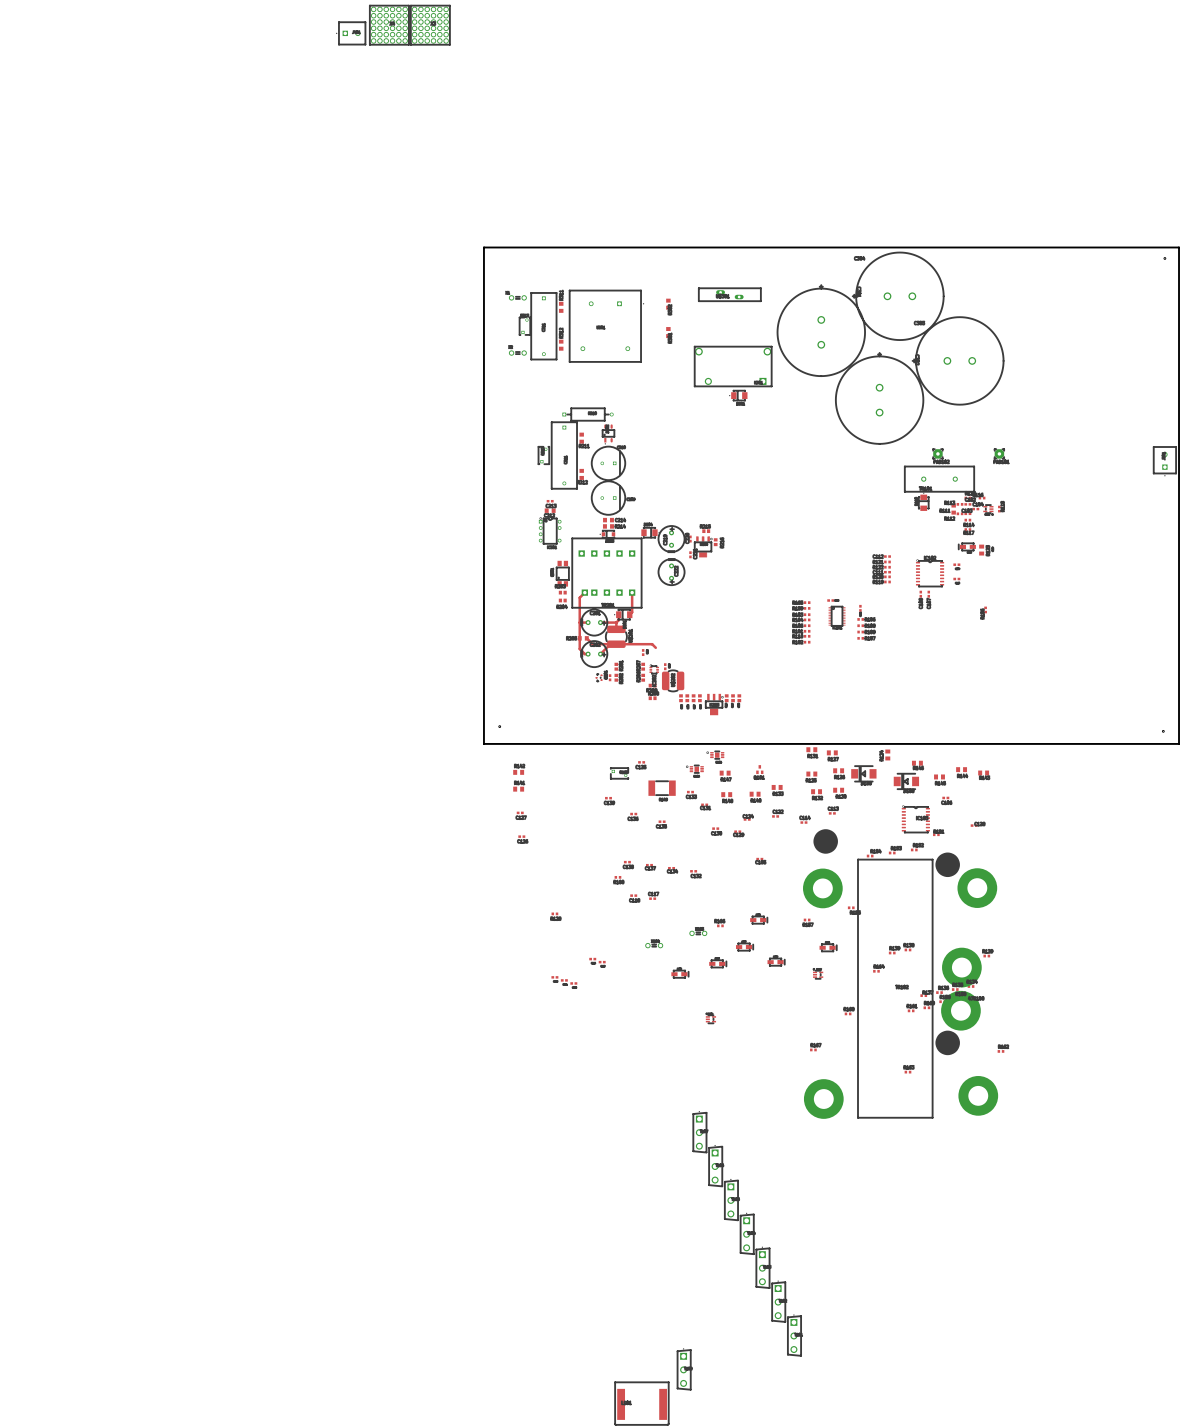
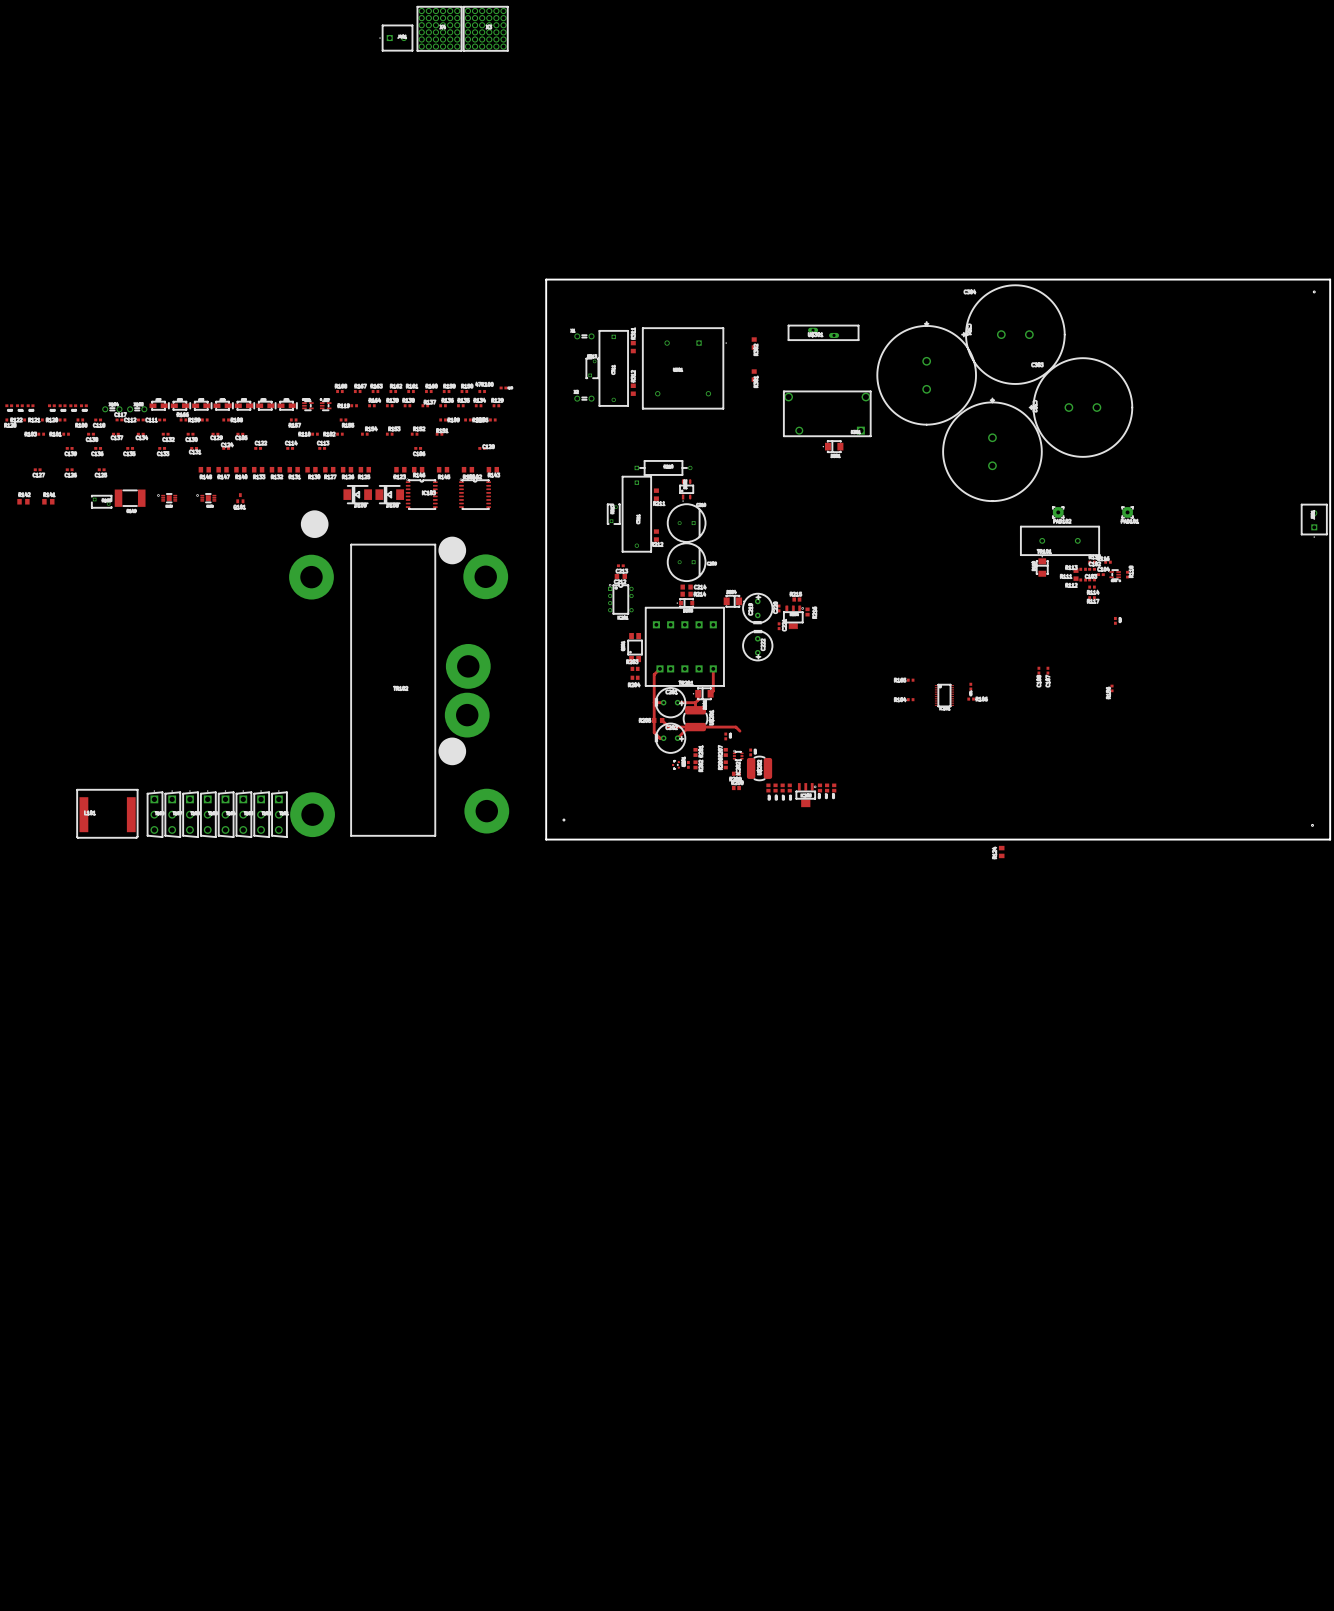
part rotation: 0° (967, 546) -> 180° (266, 405)
part position: (967, 546) -> (266, 405)
part rotation: 0° (981, 550) -> 90° clockwise (400, 469)
part position: (981, 550) -> (400, 469)
part position: (887, 556) -> (140, 419)
part position: (887, 561) -> (44, 419)
part position: (956, 564) -> (83, 405)
part position: (887, 567) -> (27, 419)
part position: (887, 572) -> (162, 419)
part position: (930, 573) -> (475, 494)
part position: (887, 576) -> (62, 419)
part position: (956, 579) -> (73, 405)
part position: (887, 581) -> (354, 405)
part position: (830, 600) -> (503, 387)
part position: (807, 608) -> (204, 419)
part position: (807, 614) -> (41, 434)
part position: (807, 625) -> (492, 419)
part position: (860, 625) -> (226, 419)
part position: (807, 631) -> (66, 434)
part position: (860, 632) -> (443, 419)
part position: (807, 636) -> (315, 434)
part position: (860, 638) -> (467, 419)
part position: (807, 642) -> (339, 434)
part position: (811, 749) -> (293, 469)
part position: (832, 752) -> (329, 469)
part position: (715, 755) -> (206, 498)
part position: (641, 762) -> (101, 469)
part position: (917, 763) -> (418, 469)
part position: (695, 769) -> (167, 498)
part position: (759, 769) -> (240, 498)
part position: (961, 769) -> (467, 469)
part position: (838, 770) -> (347, 469)
part position: (518, 772) -> (23, 501)
part position: (619, 773) -> (101, 501)
part position: (725, 773) -> (222, 469)
part position: (863, 773) -> (357, 494)
part position: (983, 773) -> (492, 469)
part position: (811, 774) -> (364, 469)
part position: (939, 776) -> (443, 469)
part position: (906, 781) -> (389, 494)
part position: (777, 787) -> (258, 469)
part position: (662, 788) -> (130, 498)
part position: (518, 789) -> (48, 501)
part position: (838, 790) -> (311, 469)
part position: (816, 791) -> (275, 469)
part position: (690, 792) -> (162, 448)
part position: (726, 794) -> (204, 469)
part position: (755, 794) -> (240, 469)
part position: (945, 797) -> (418, 448)
part position: (608, 798) -> (69, 448)
part position: (704, 804) -> (194, 448)
part position: (520, 812) -> (37, 469)
part position: (832, 813) -> (322, 448)
part position: (633, 814) -> (98, 448)
part position: (775, 816) -> (258, 448)
part position: (747, 819) -> (226, 448)
part position: (915, 819) -> (421, 494)
part position: (662, 821) -> (130, 448)
part position: (803, 822) -> (290, 448)
part position: (974, 825) -> (482, 448)
part position: (715, 828) -> (190, 434)
part position: (737, 831) -> (215, 434)
part position: (936, 834) -> (439, 434)
part position: (521, 836) -> (69, 469)
part position: (914, 849) -> (414, 434)
part position: (892, 852) -> (389, 434)
part position: (870, 856) -> (364, 434)
part position: (759, 859) -> (240, 434)
part position: (627, 862) -> (91, 434)
part position: (649, 865) -> (115, 434)
part position: (671, 868) -> (140, 434)
part position: (693, 871) -> (165, 434)
part position: (617, 877) -> (80, 419)
part position: (633, 895) -> (98, 419)
part position: (652, 898) -> (119, 419)
part position: (851, 907) -> (343, 419)
part position: (554, 913) -> (9, 419)
part position: (758, 920) -> (223, 405)
part position: (807, 920) -> (293, 419)
part position: (720, 925) -> (183, 419)
part position: (698, 933) -> (137, 409)
part position: (654, 945) -> (112, 409)
part position: (744, 947) -> (159, 405)
part position: (828, 947) -> (287, 405)
part position: (907, 949) -> (407, 405)
part position: (892, 953) -> (389, 405)
part position: (986, 956) -> (496, 405)
part position: (592, 959) -> (51, 405)
part position: (602, 962) -> (62, 405)
part position: (776, 962) -> (244, 405)
part position: (717, 963) -> (201, 405)
part position: (876, 971) -> (371, 405)
part position: (680, 974) -> (180, 405)
part position: (818, 974) -> (325, 405)
part position: (900, 974) -> (399, 673)
part position: (554, 977) -> (9, 405)
part position: (564, 980) -> (19, 405)
part position: (573, 983) -> (30, 405)
part position: (971, 986) -> (478, 405)
part position: (955, 989) -> (460, 405)
part position: (939, 992) -> (443, 405)
part position: (923, 995) -> (425, 405)
part position: (958, 998) -> (464, 391)
part position: (942, 1001) -> (446, 391)
part position: (974, 1004) -> (482, 391)
part position: (926, 1007) -> (428, 391)
part position: (911, 1010) -> (411, 391)
part position: (848, 1013) -> (339, 391)
part position: (710, 1019) -> (307, 405)
part position: (813, 1049) -> (357, 391)
part position: (1000, 1051) -> (393, 391)
part position: (907, 1072) -> (375, 391)
part position: (700, 1131) -> (172, 813)
part position: (715, 1165) -> (190, 813)
part position: (731, 1199) -> (208, 813)
part position: (747, 1233) -> (226, 813)
part position: (763, 1267) -> (244, 813)
part position: (778, 1301) -> (261, 813)
part position: (794, 1335) -> (279, 813)
part position: (684, 1369) -> (155, 813)
part position: (641, 1403) -> (107, 813)

